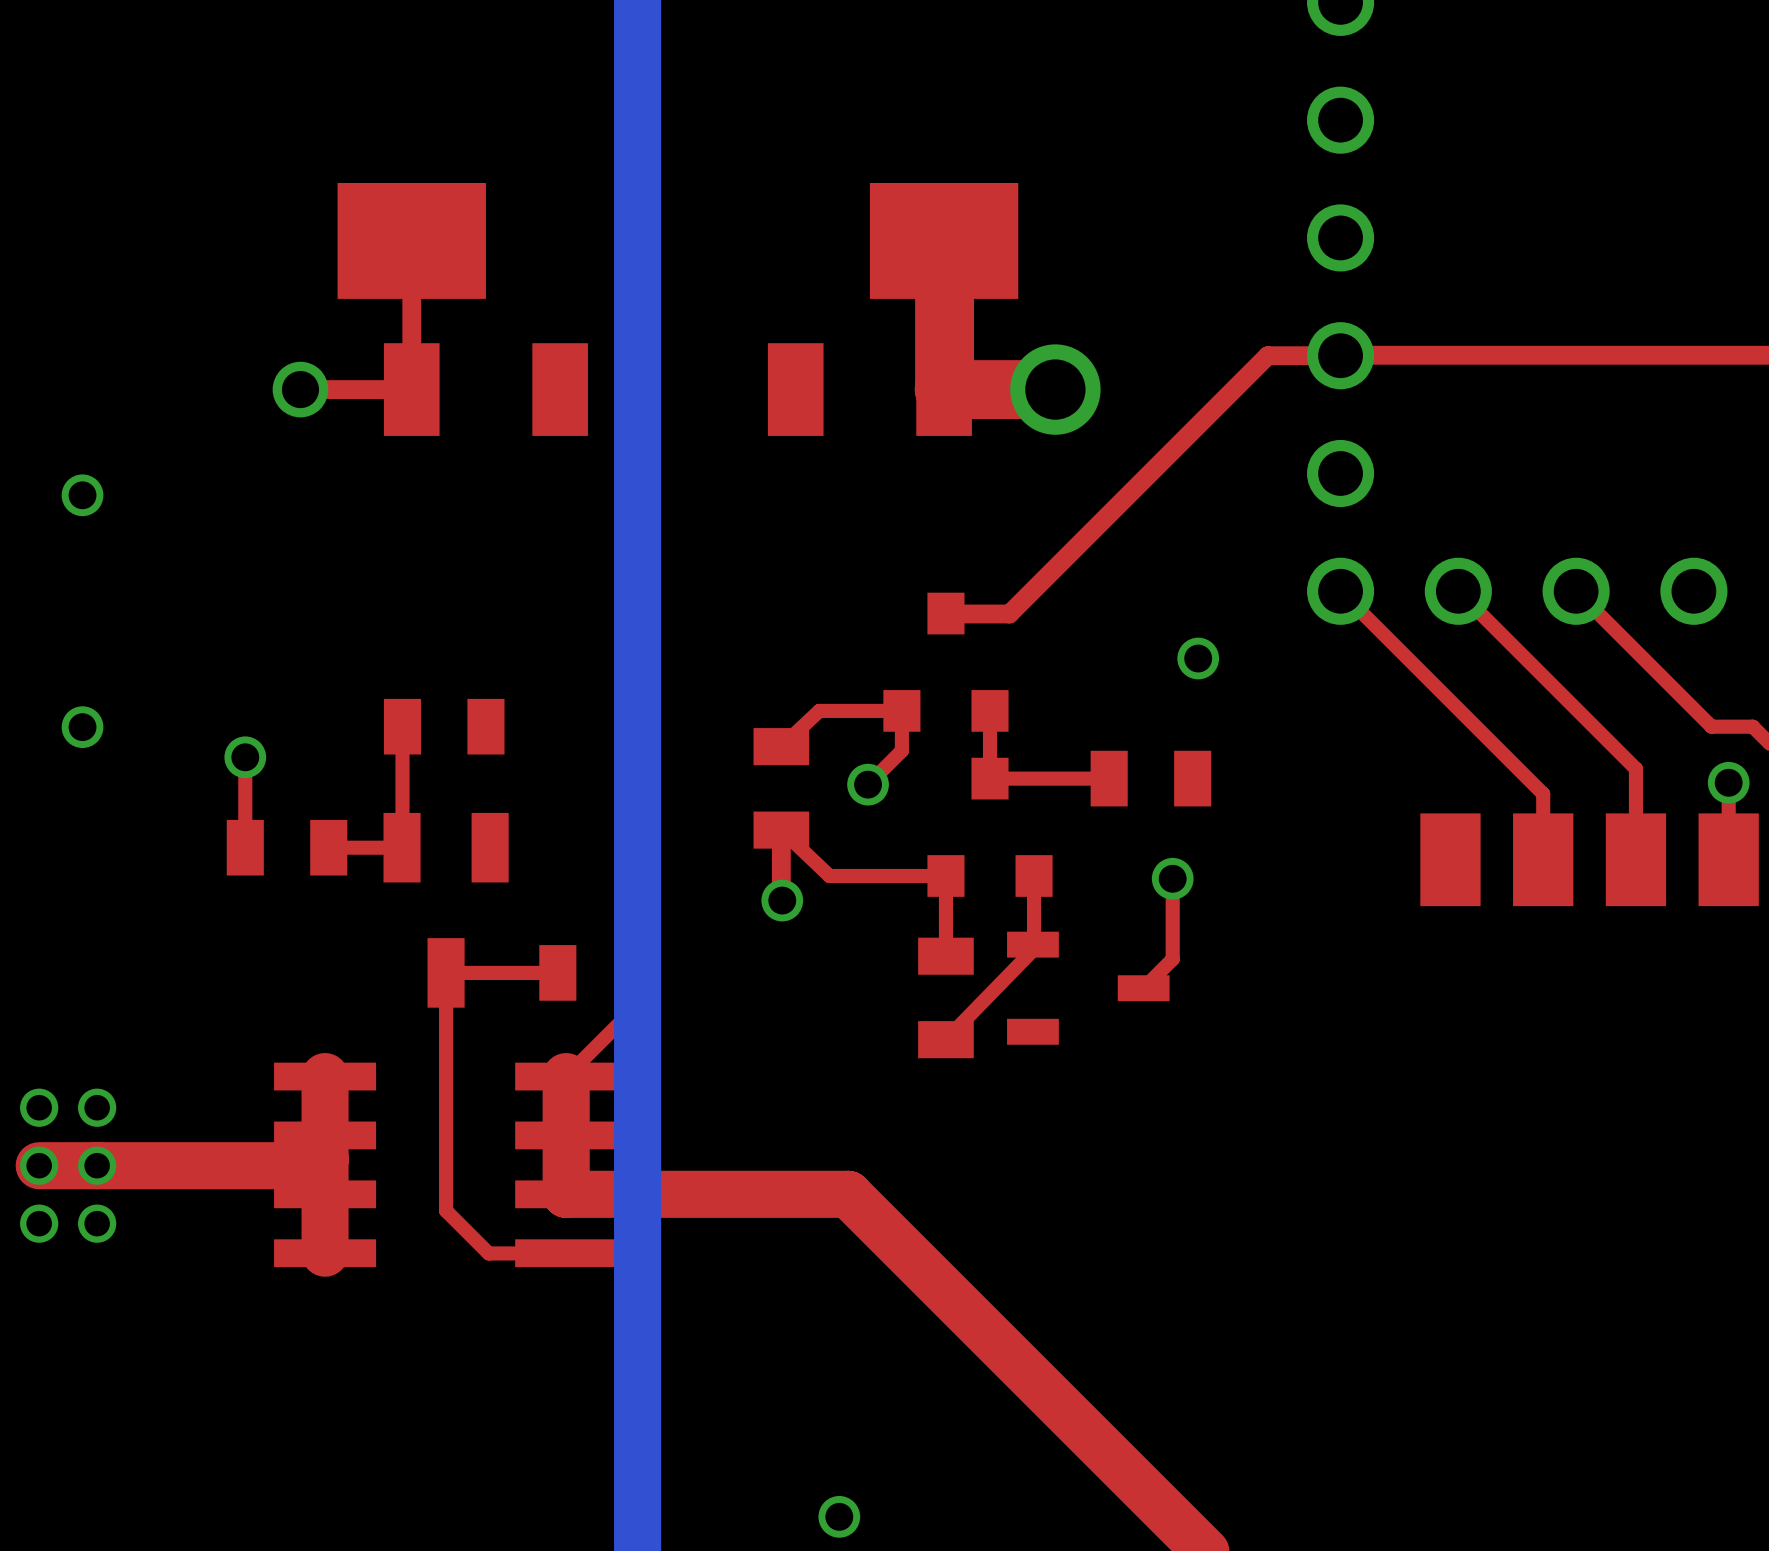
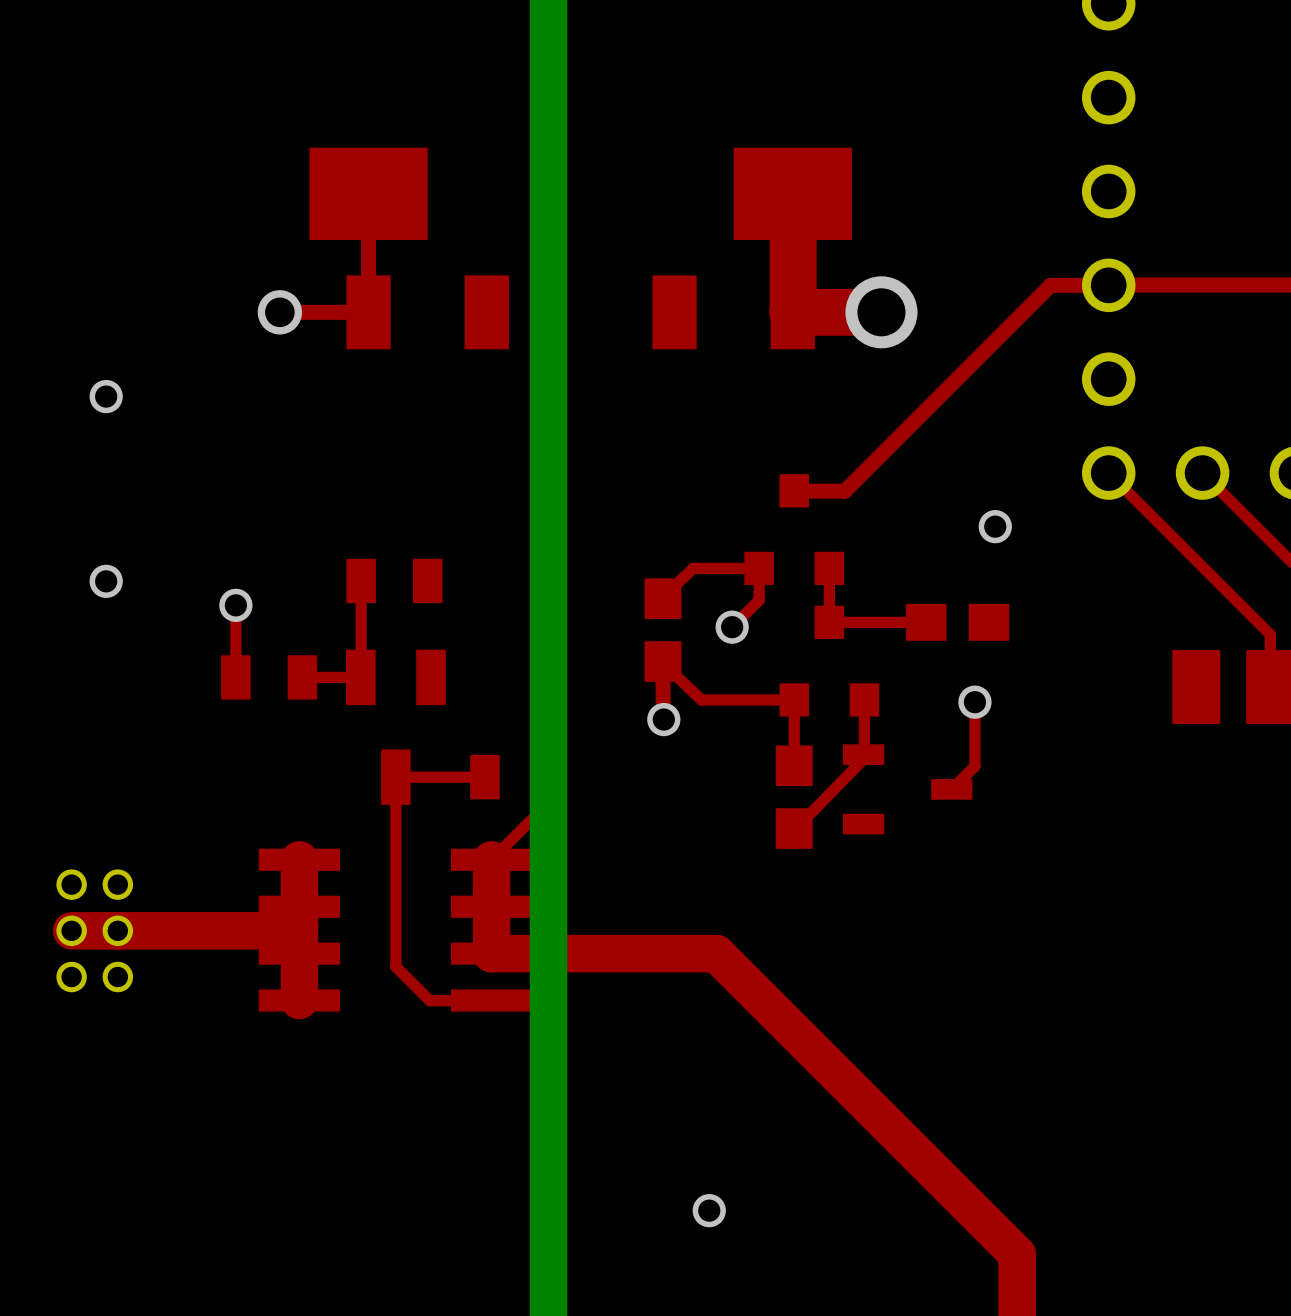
part footprint: [753, 728, 810, 849] -> [644, 578, 682, 682]
part footprint: [1090, 750, 1212, 807] -> [905, 603, 1010, 641]
part footprint: [918, 937, 974, 1059] -> [775, 745, 813, 849]

